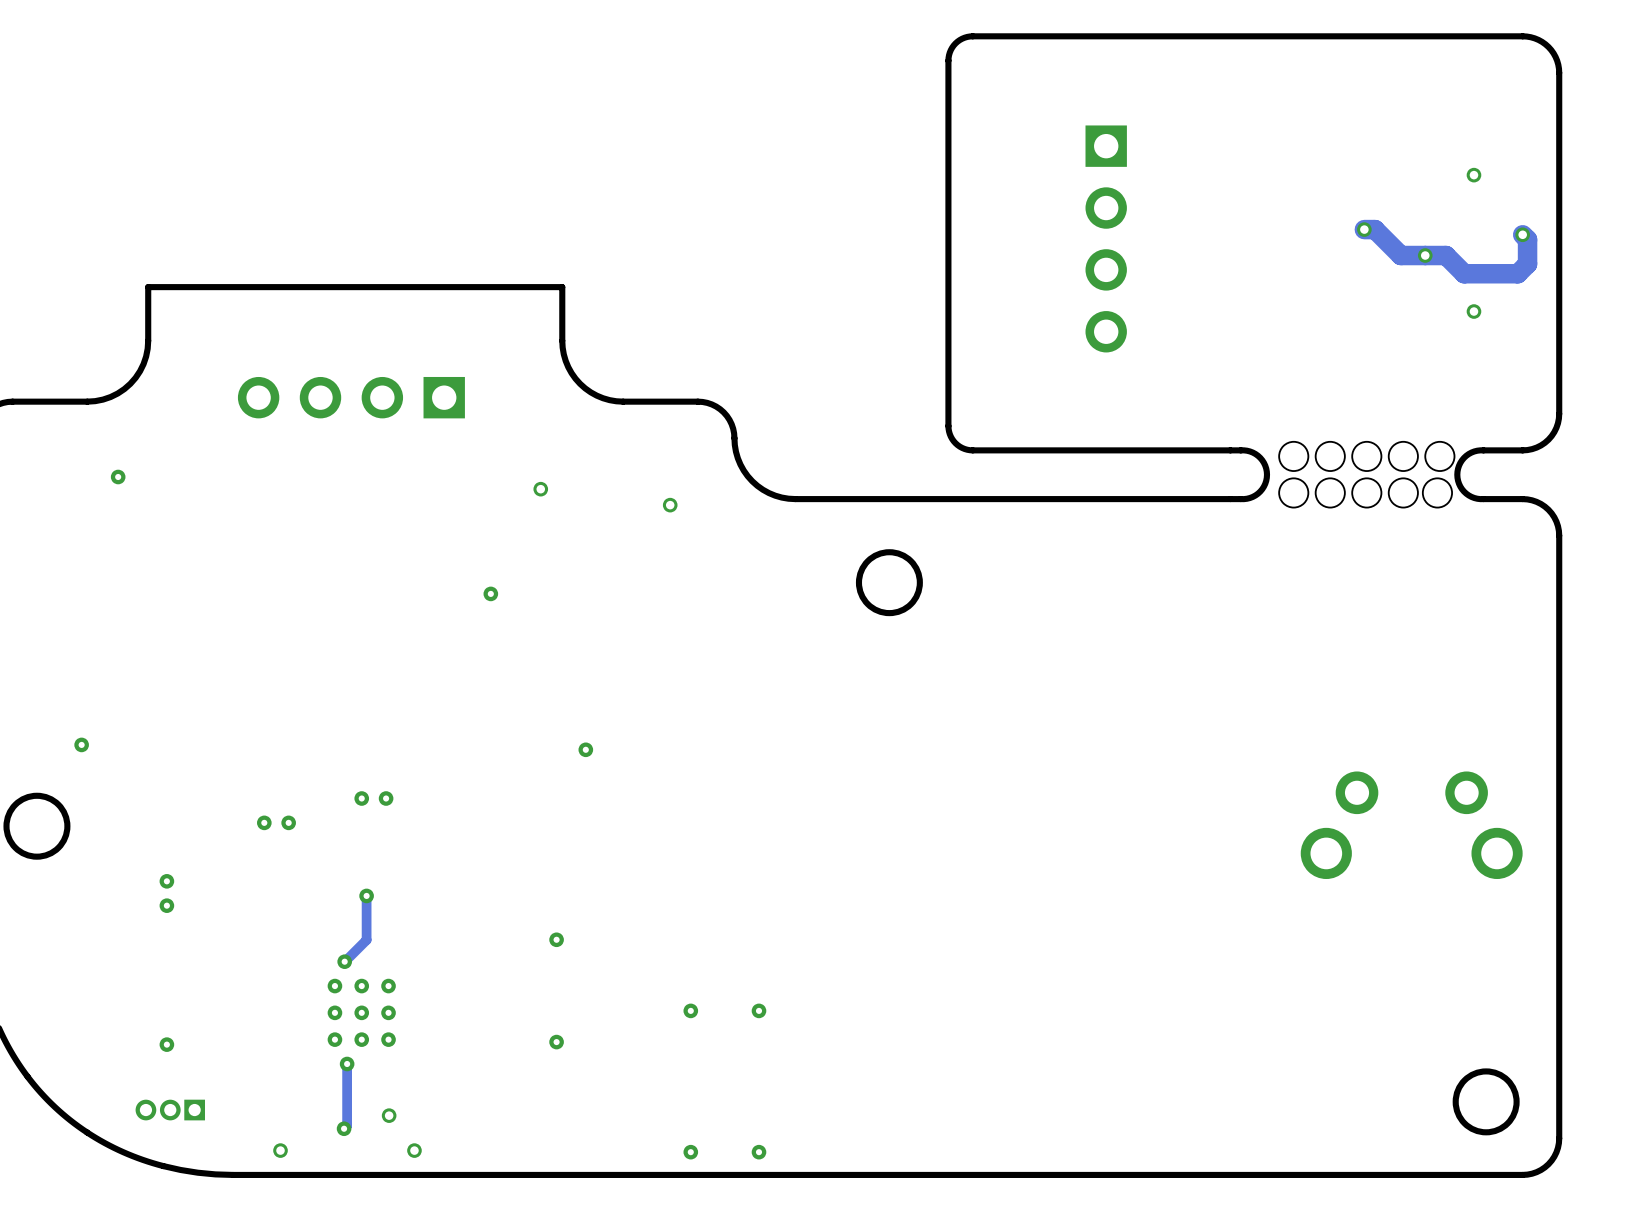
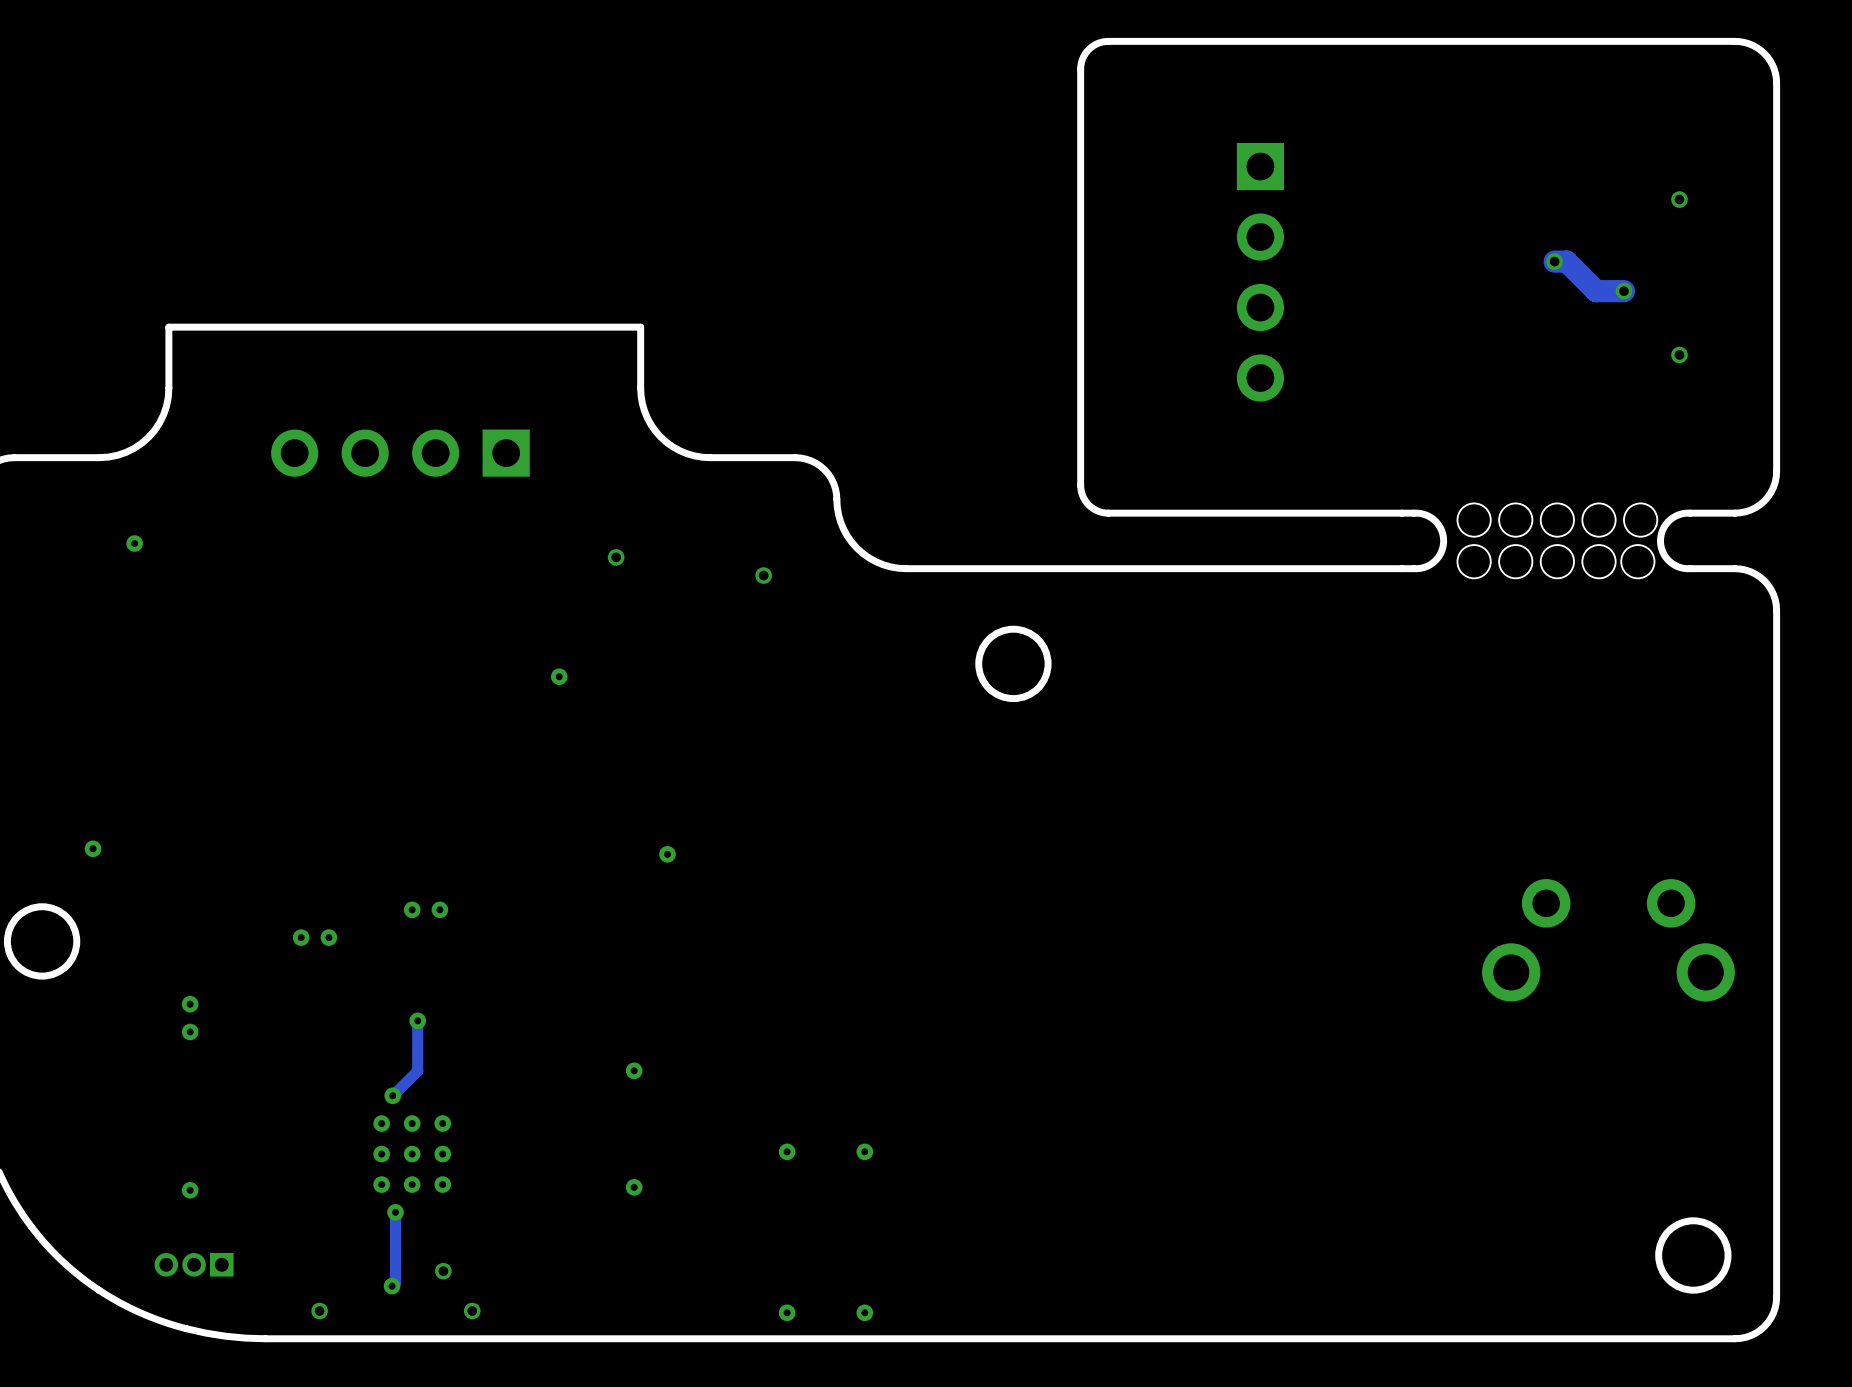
track: (1522, 234) (1527, 239) (1527, 264) (1517, 273) (1464, 273) (1446, 255) (1425, 255) -> none
via: (1522, 234) -> none

